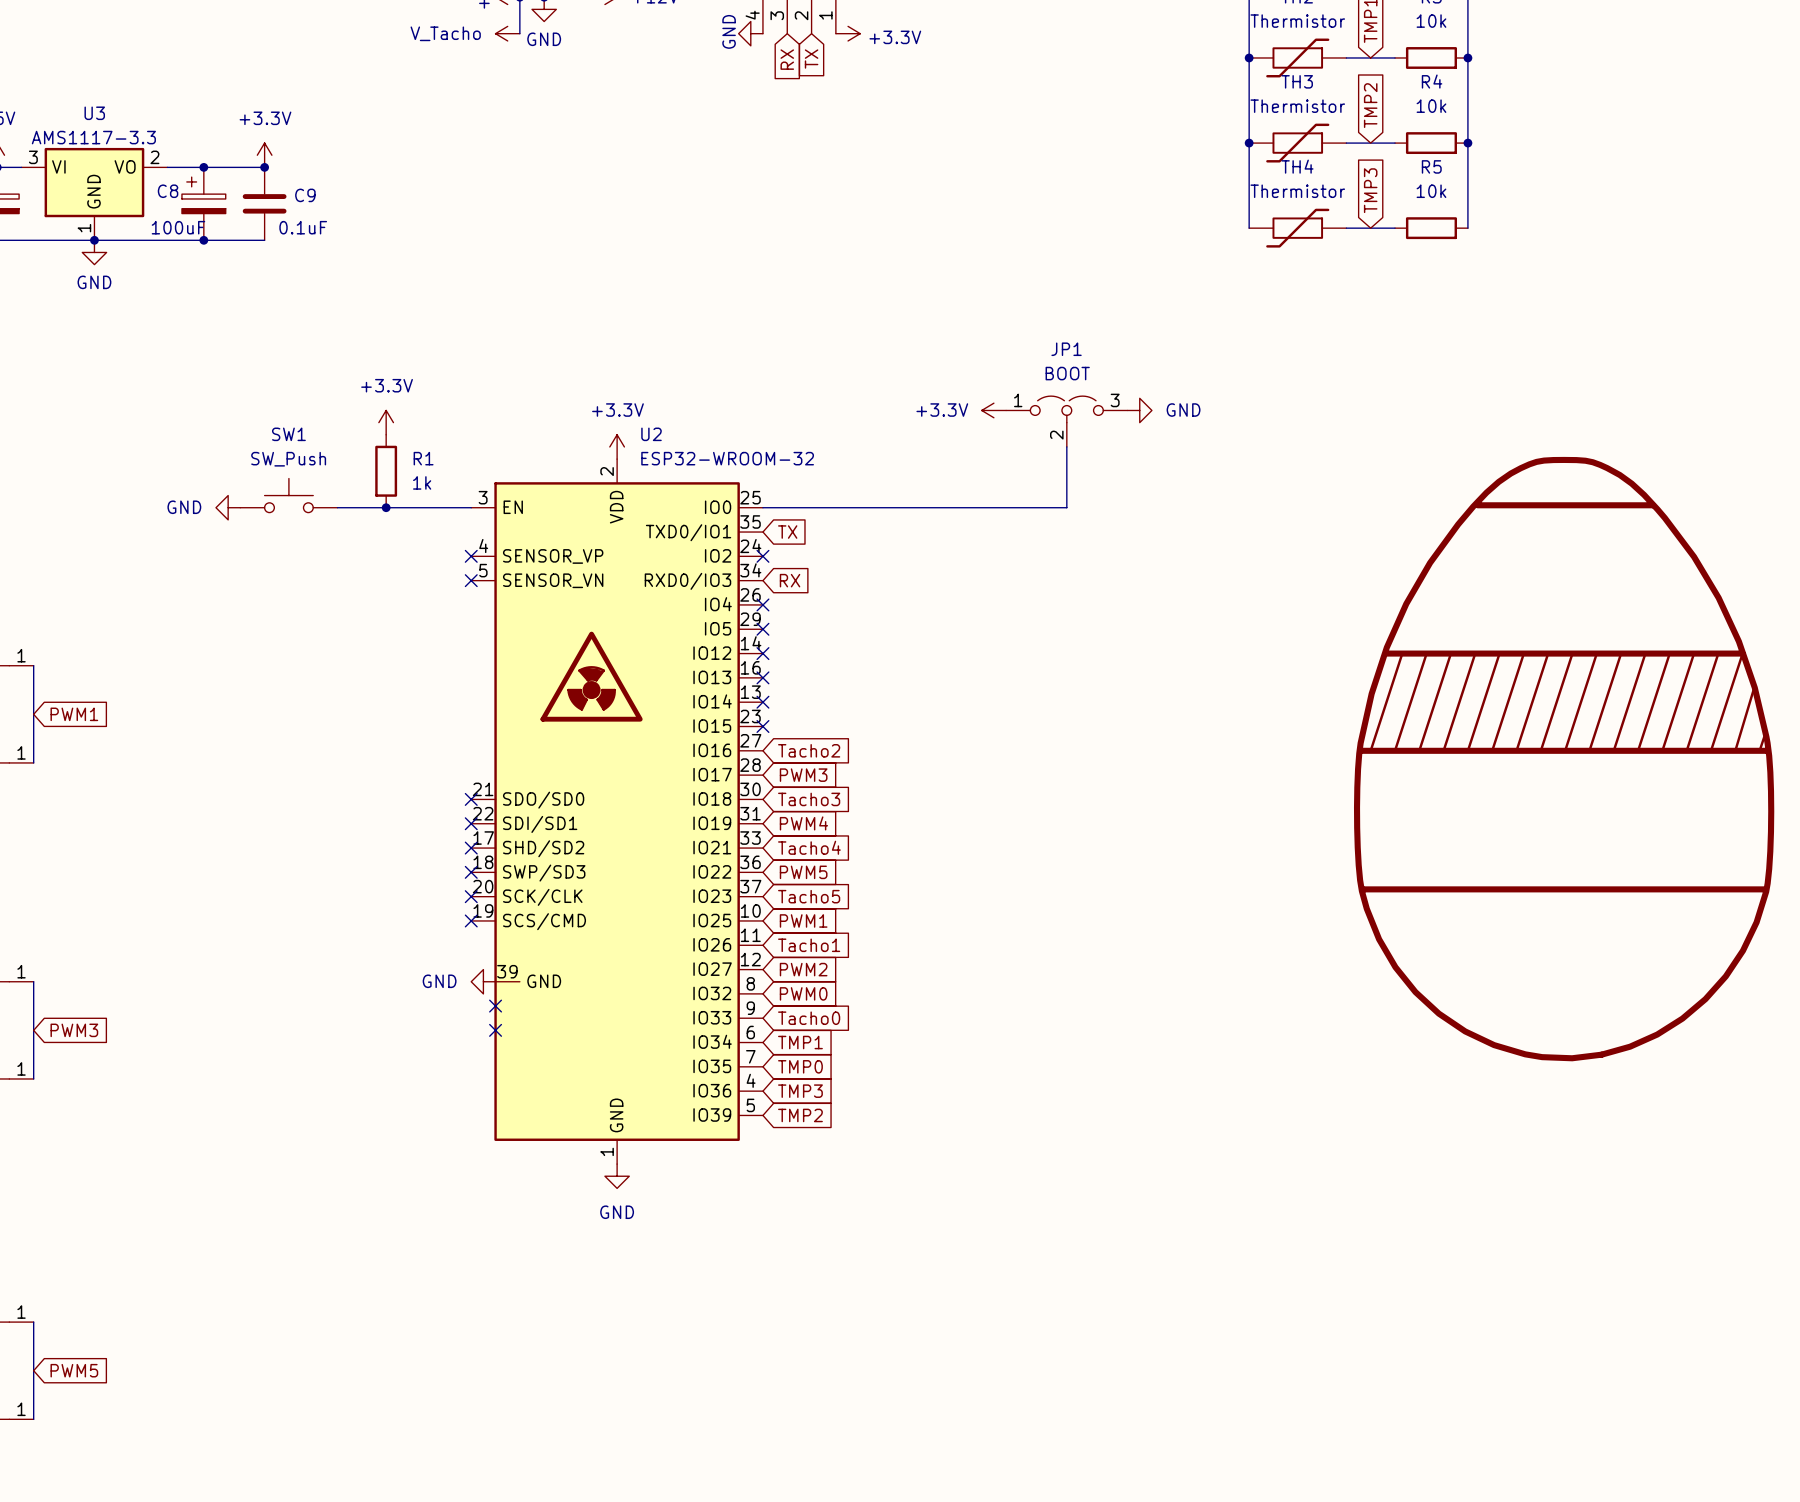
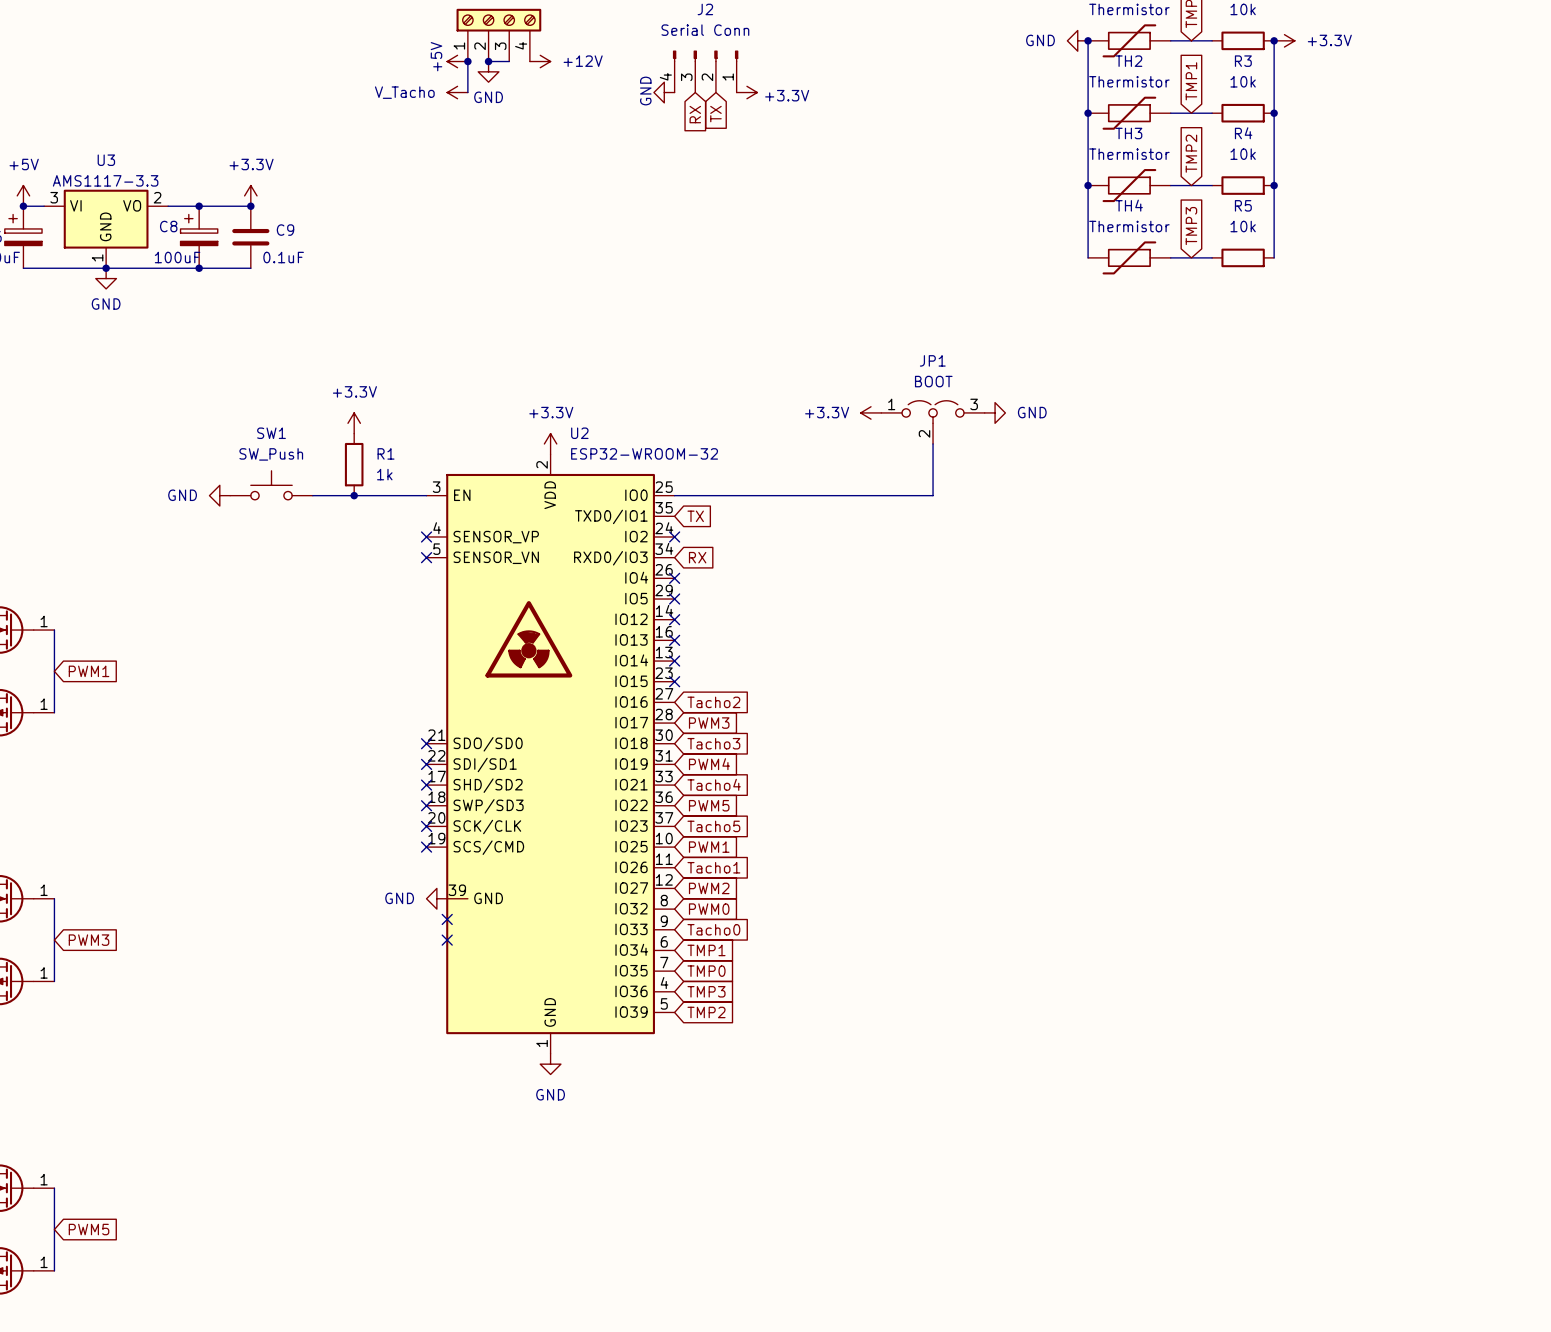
part: (1564, 759) -> none

